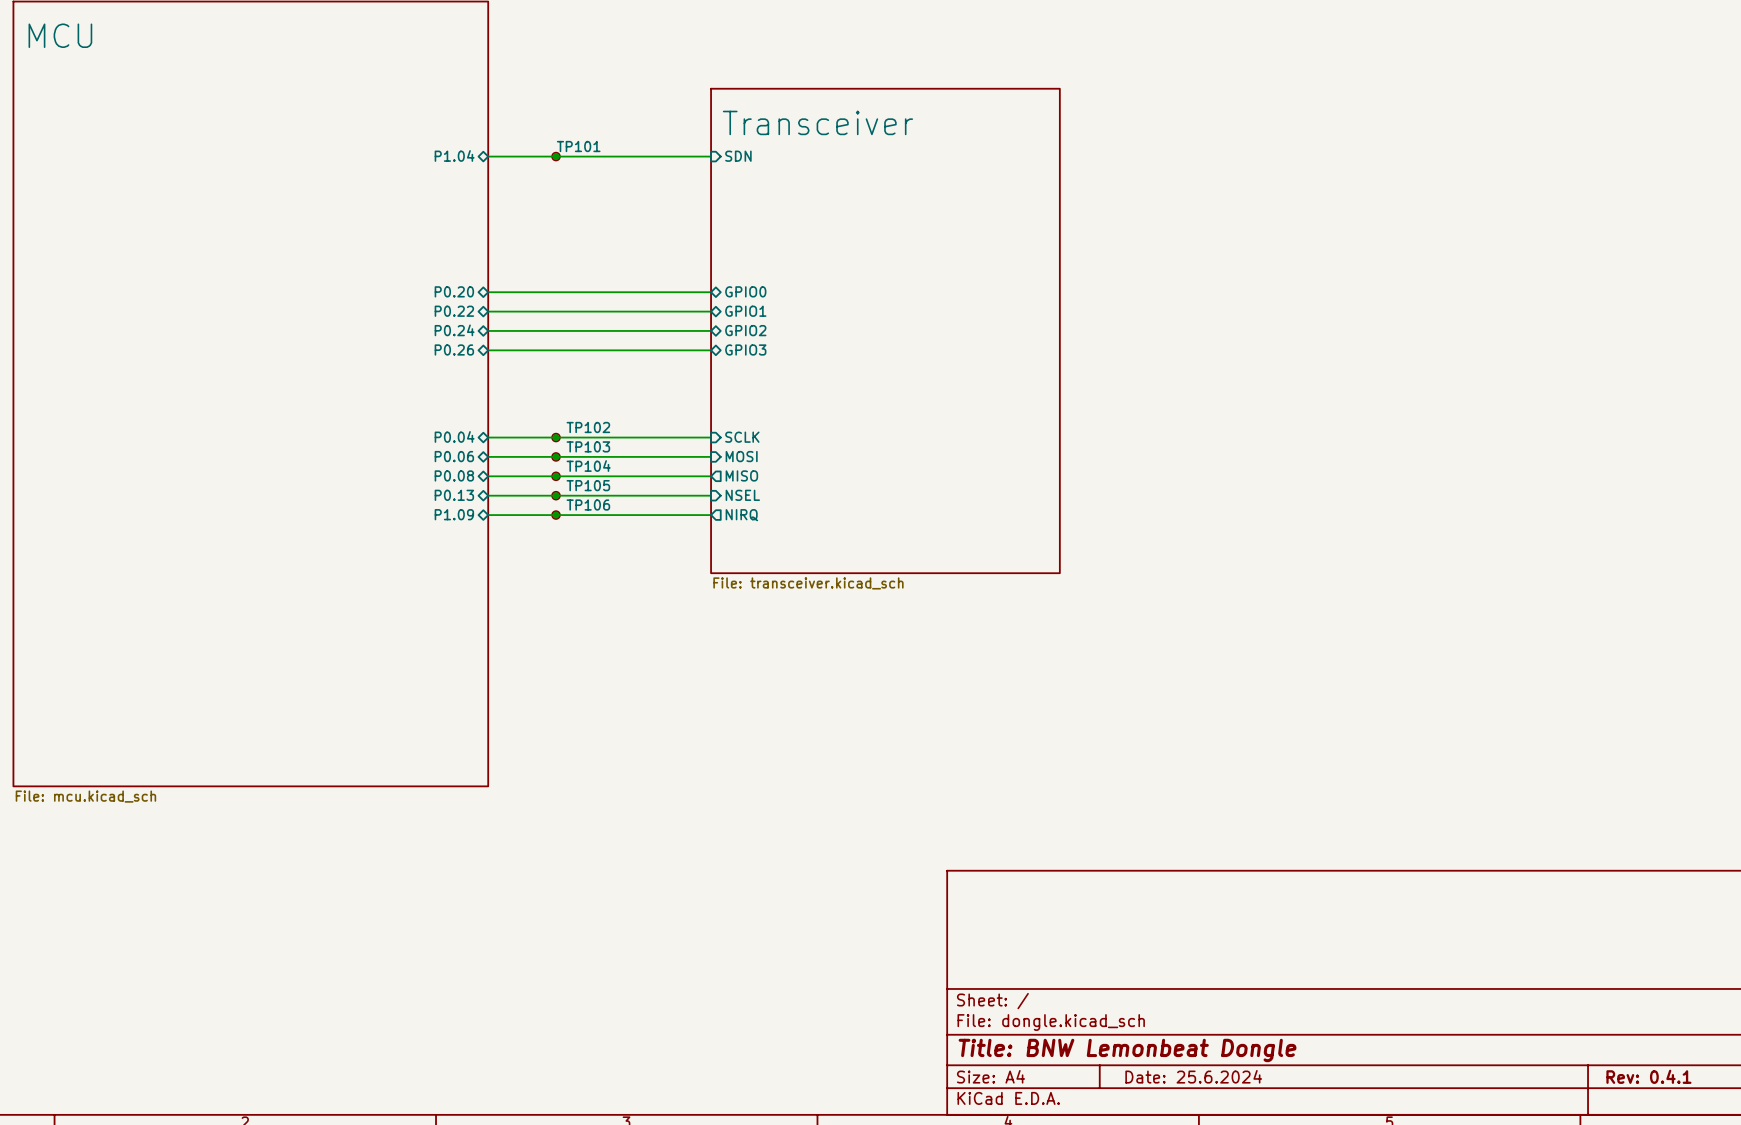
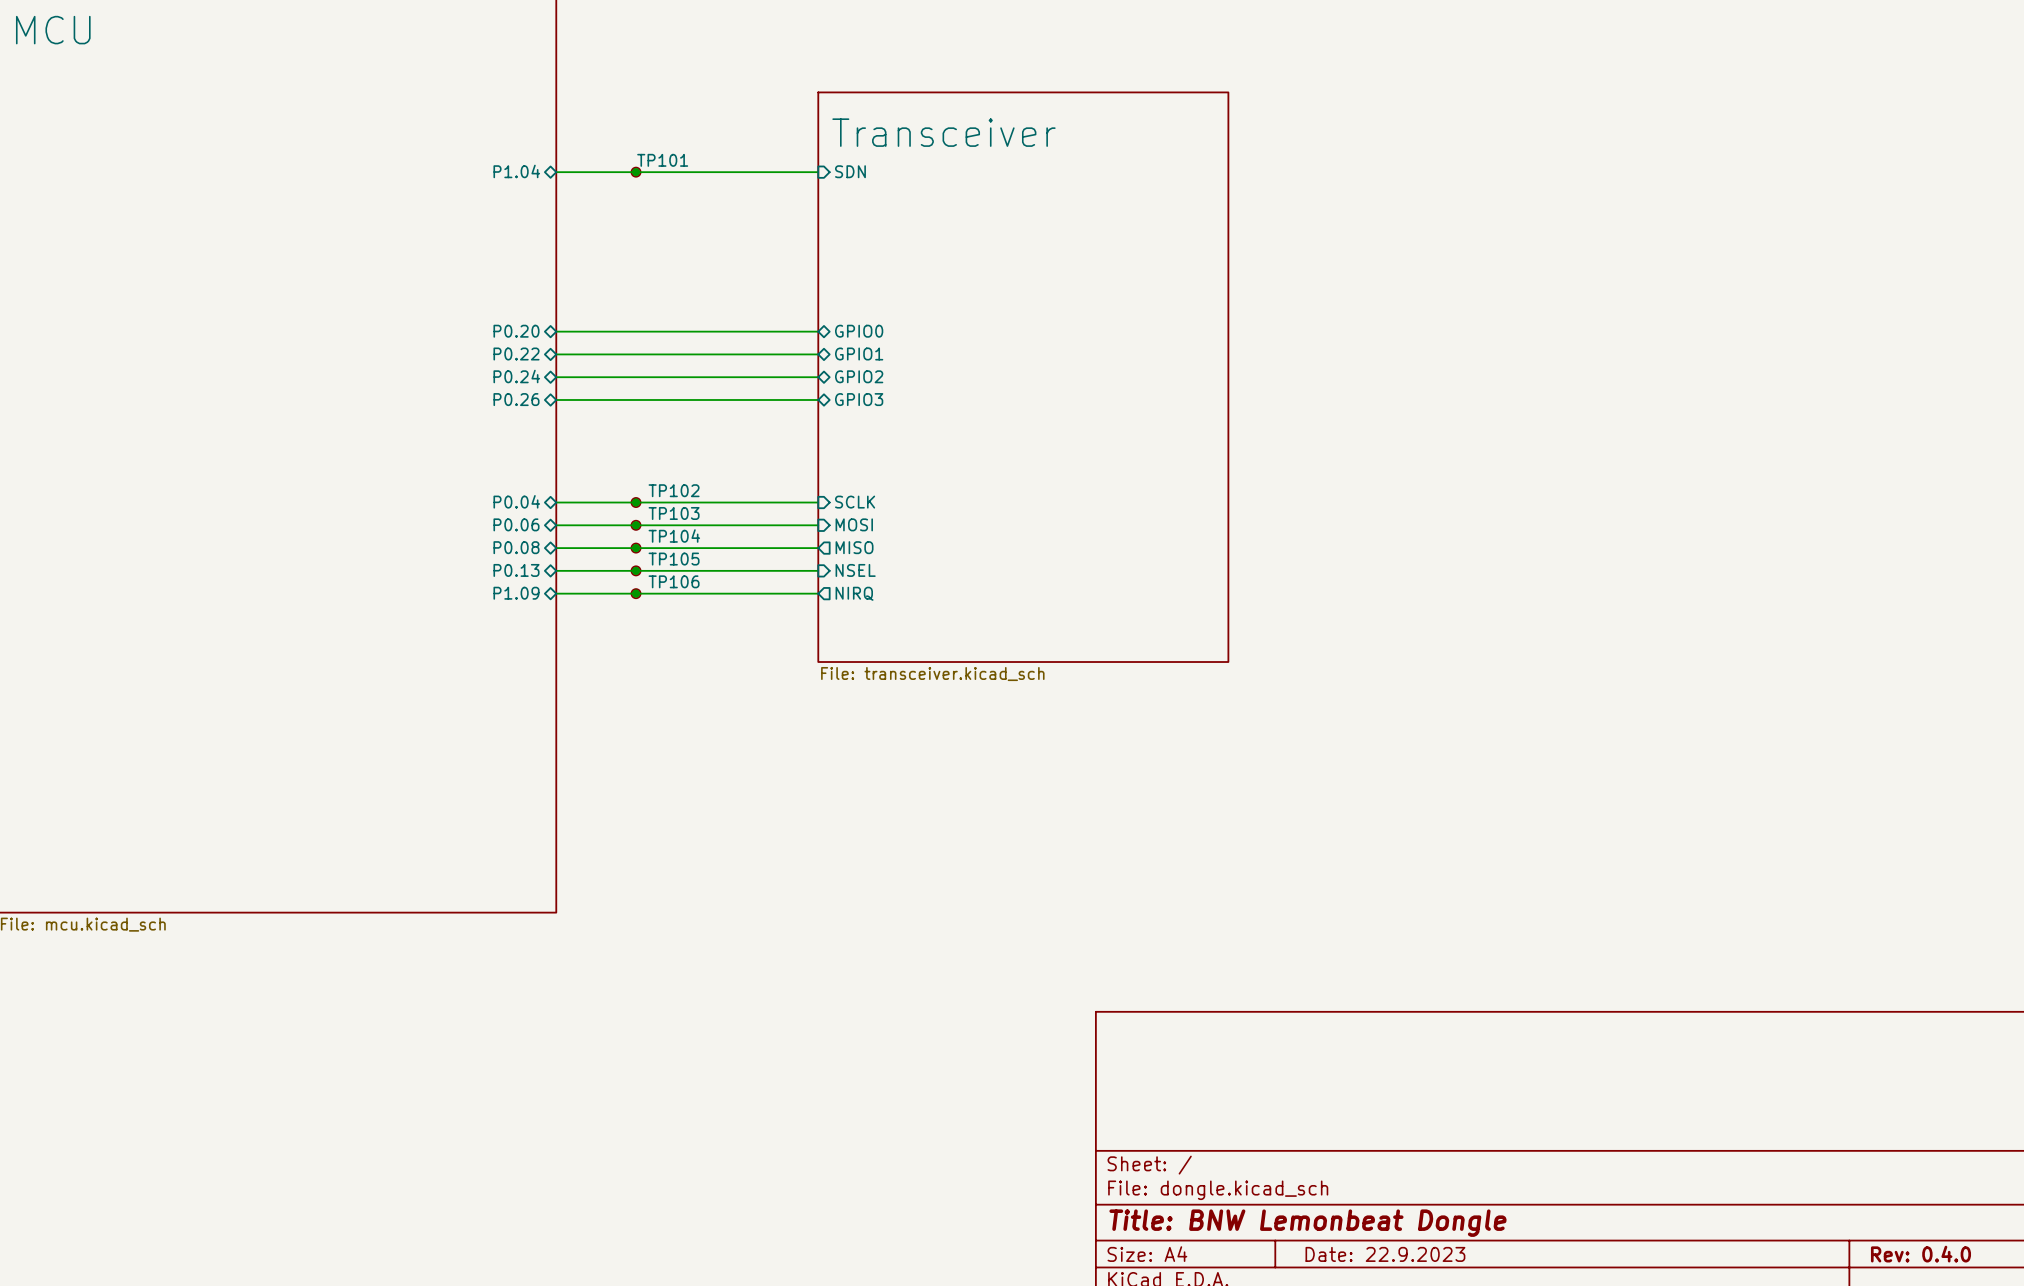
title block: Date: 25.6.2024 (1193, 1076) -> Date: 22.9.2023 (1385, 1254)
title block: Rev: 0.4.1 (1648, 1076) -> Rev: 0.4.0 (1920, 1254)

